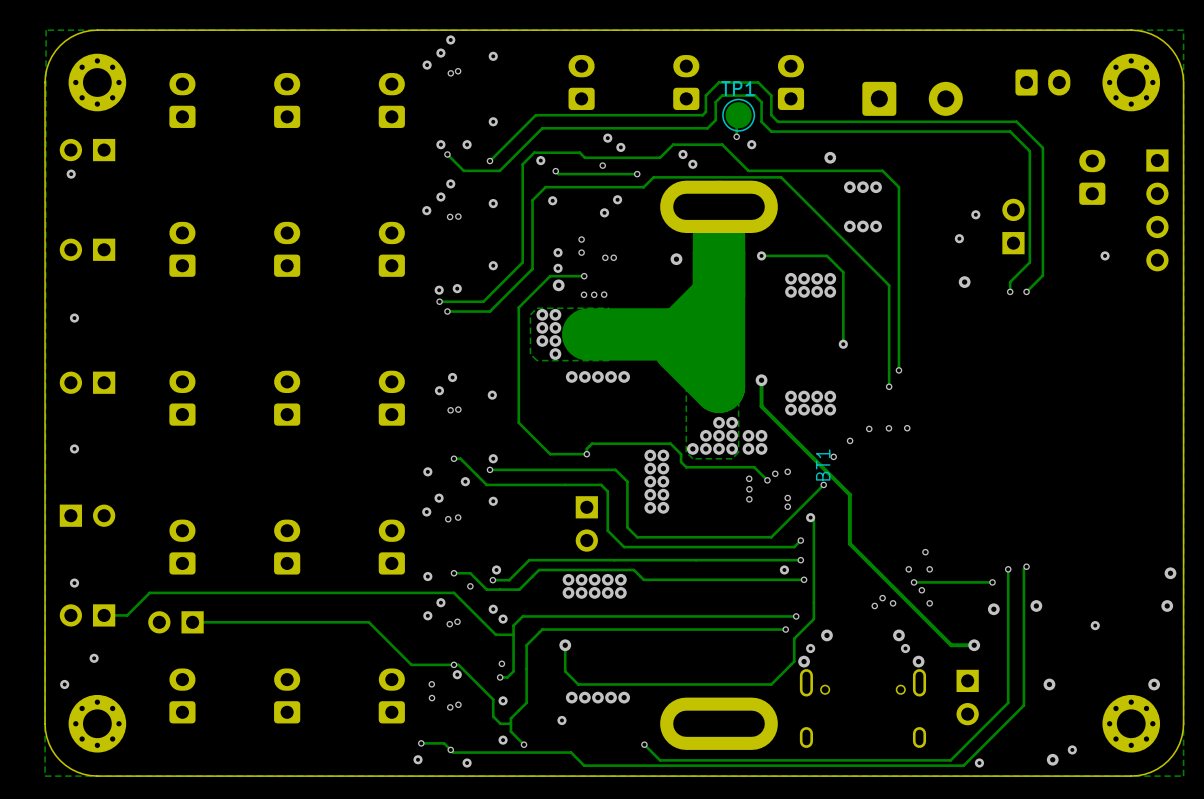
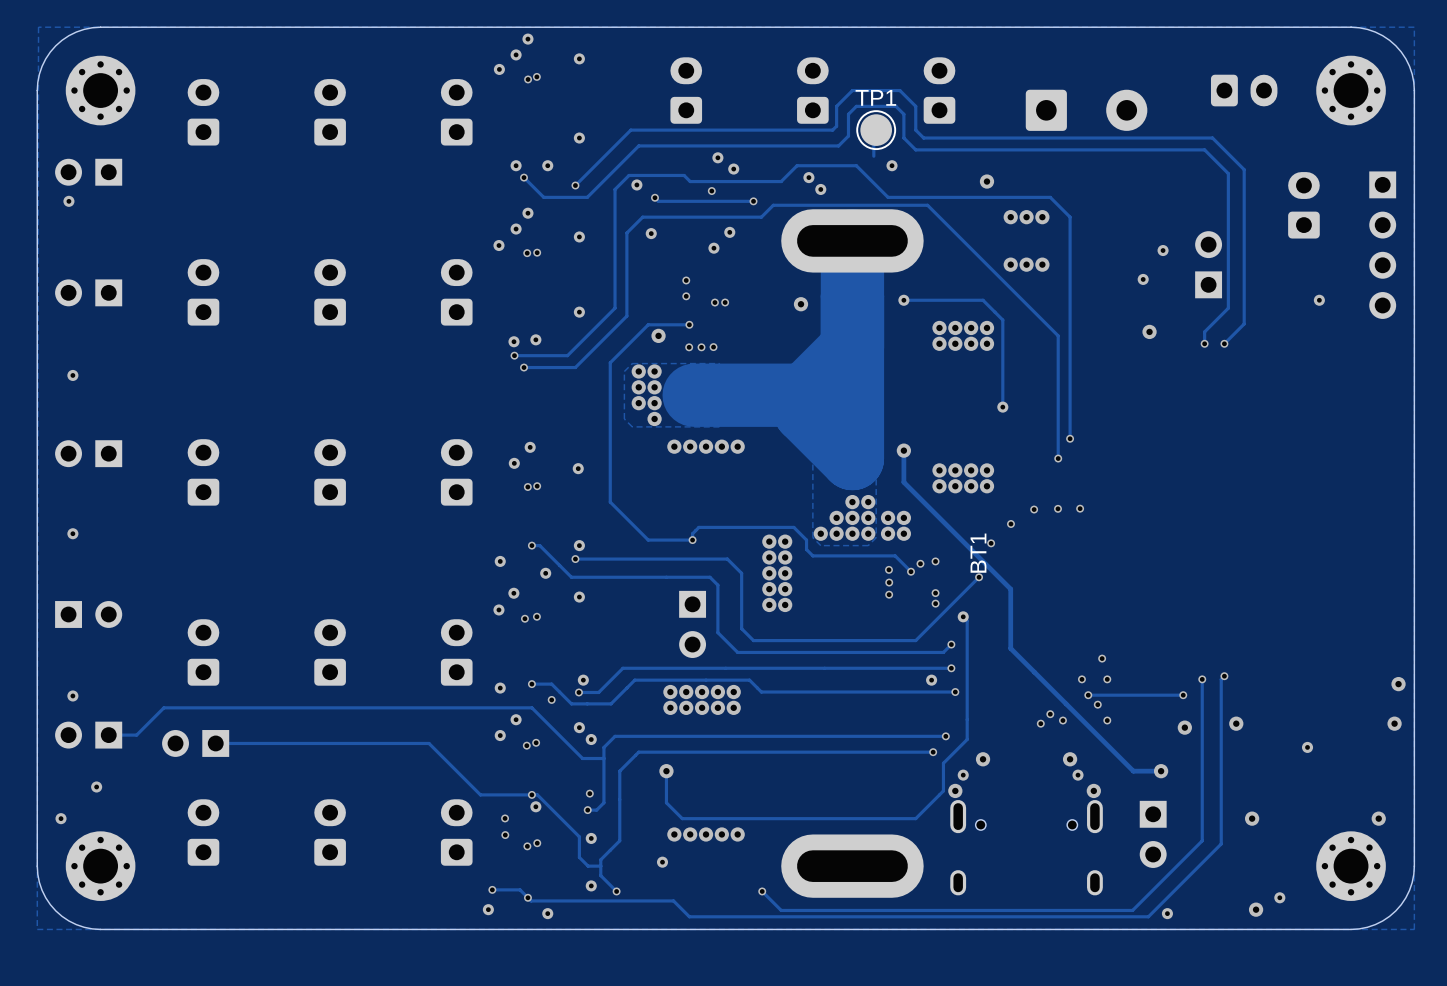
via: (736, 136) -> none
via: (558, 252) -> none
via: (558, 268) -> none

